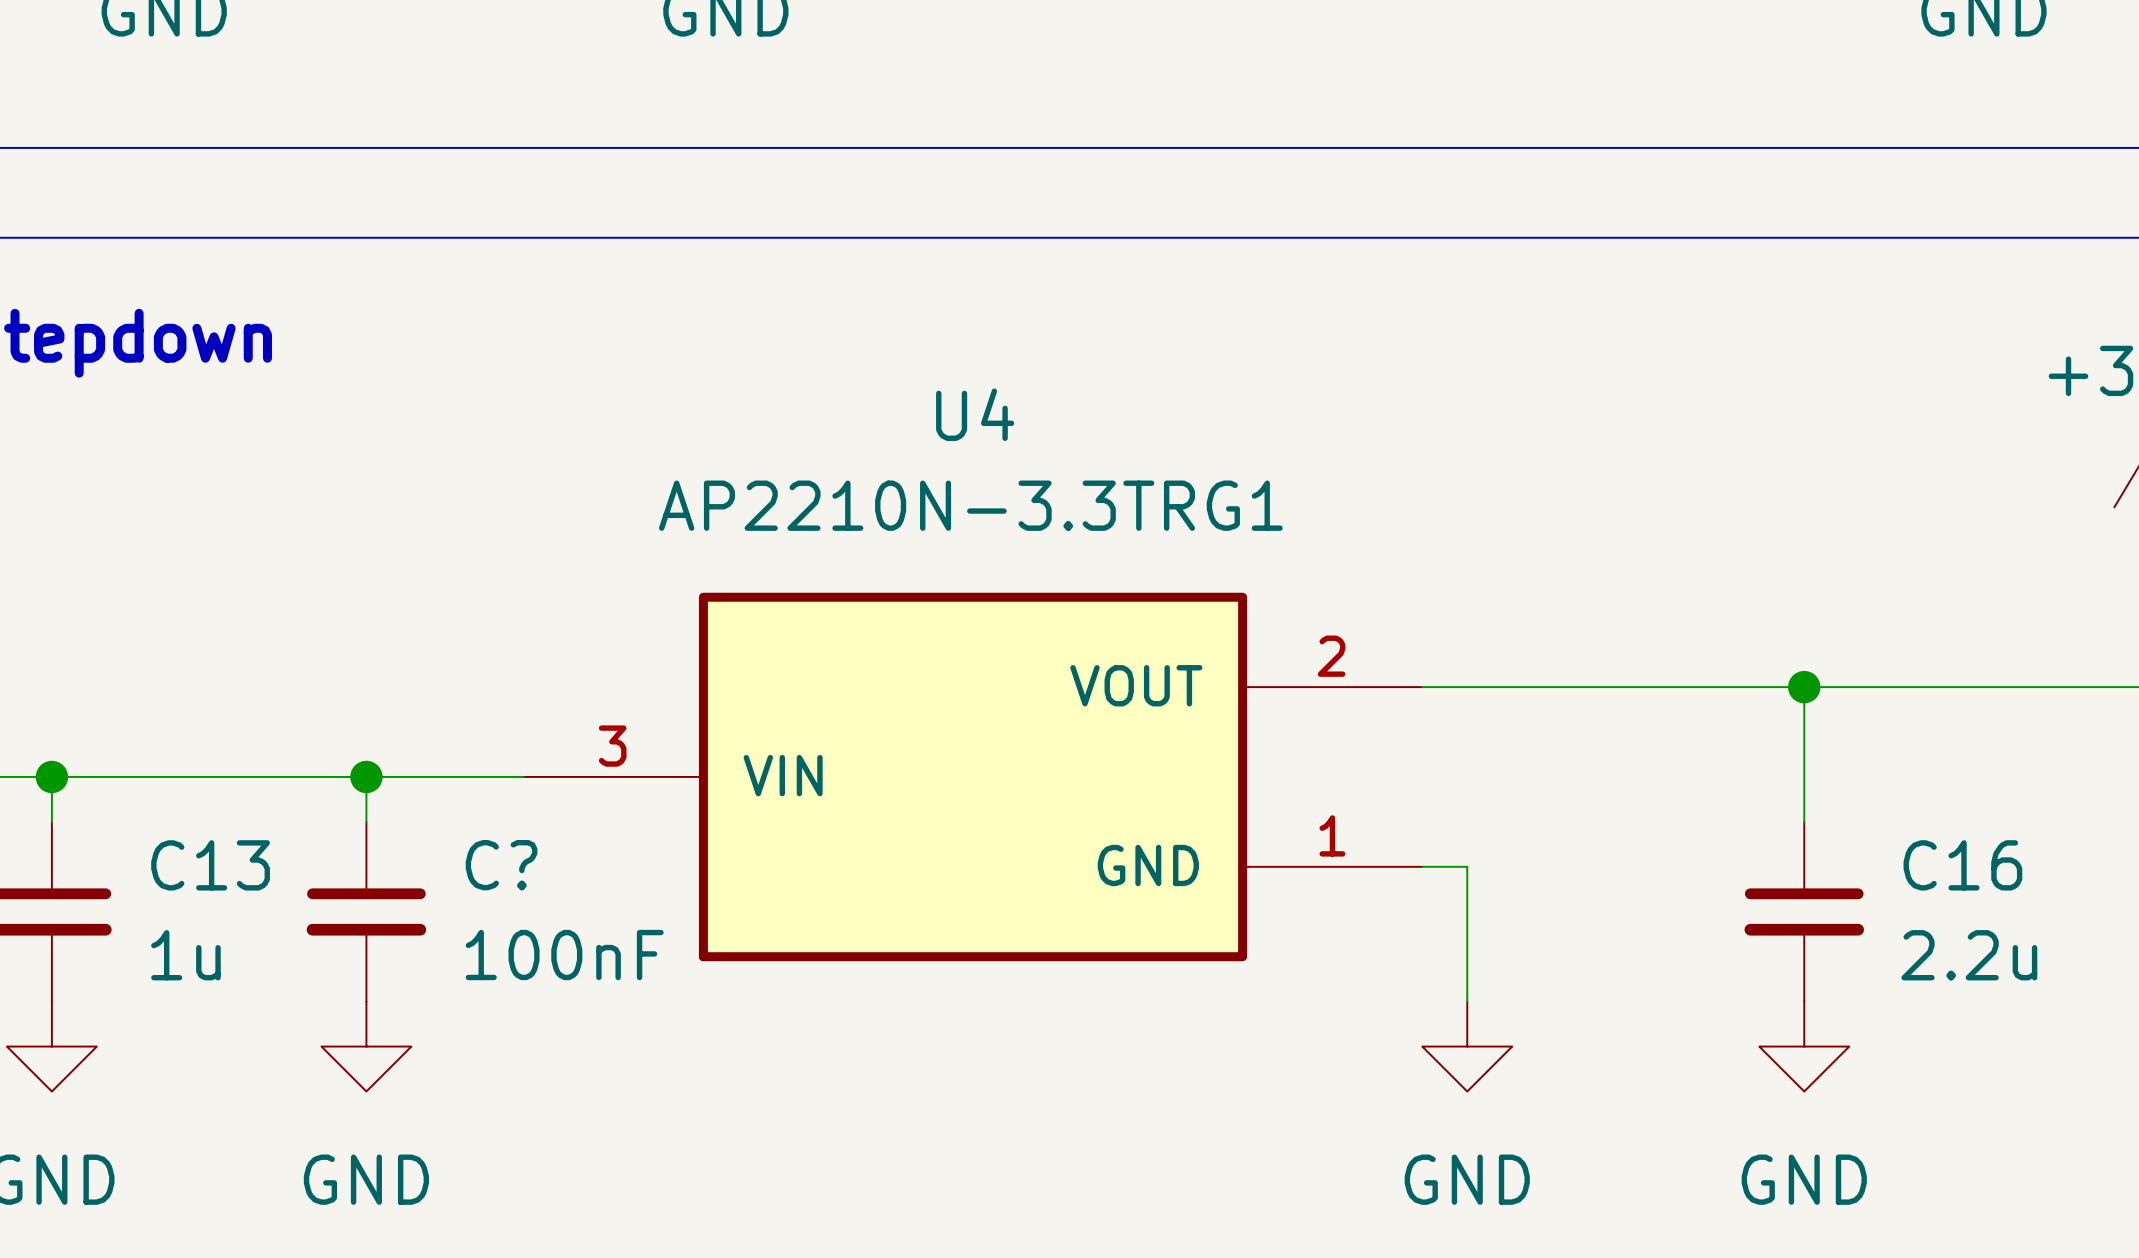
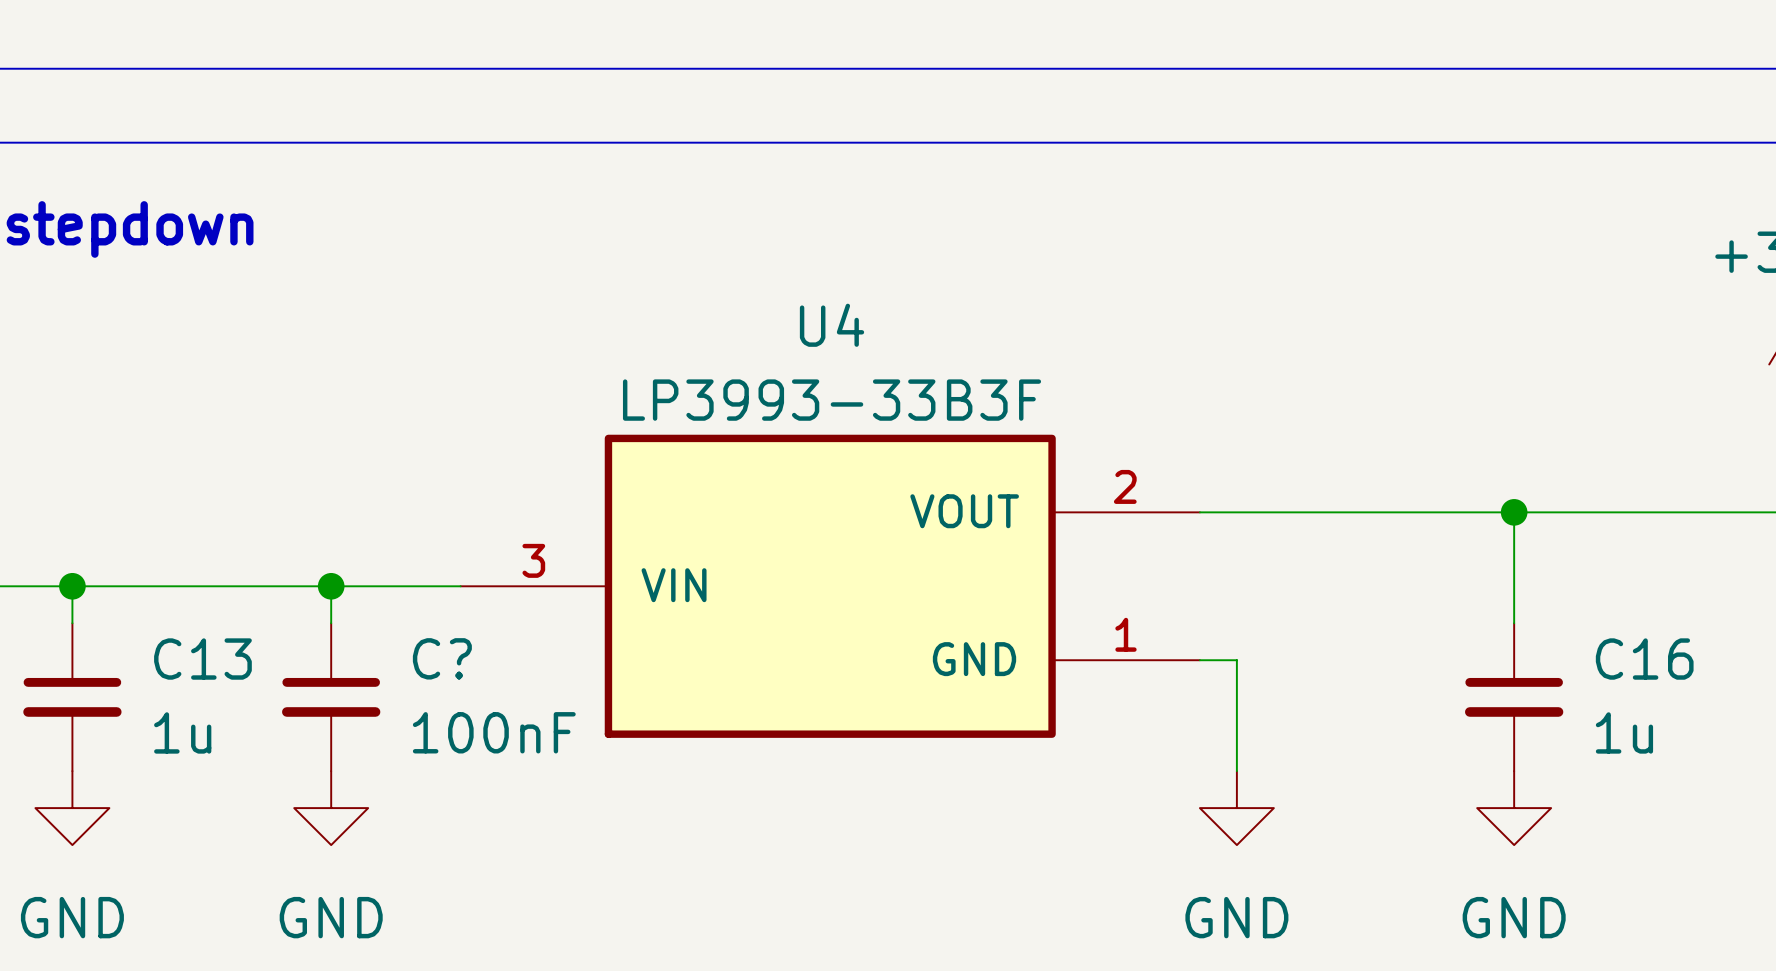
U4 name position: U4 (975, 414) -> U4 (832, 325)
U4 value: AP2210N-3.3TRG1 (970, 505) -> LP3993-33B3F (832, 400)
C16 value: 2.2u (1969, 955) -> 1u (1624, 732)

